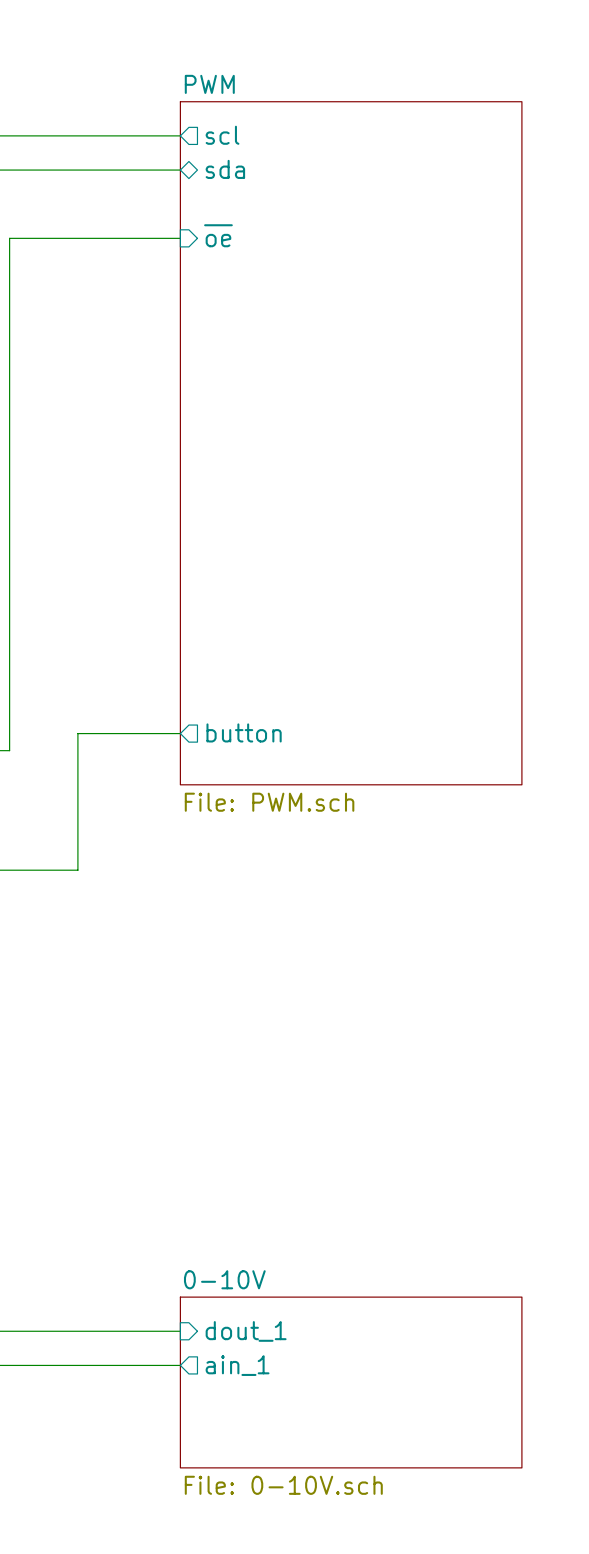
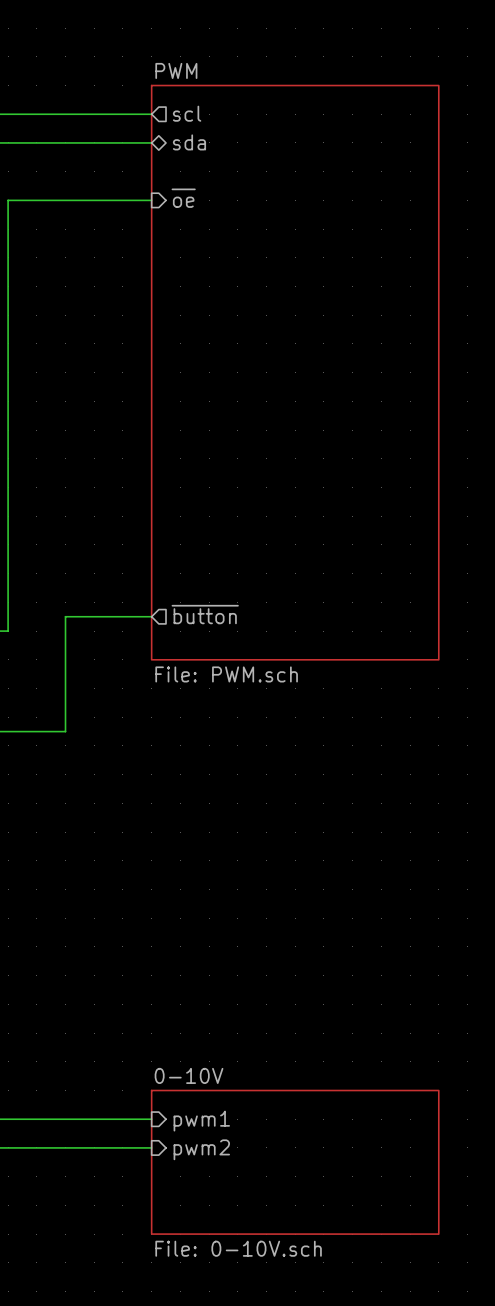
sheet pin: button (244, 732) -> ~{button} (205, 614)
sheet pin: dout_1 (246, 1331) -> pwm1 (201, 1121)
sheet pin shape: output (237, 1365) -> input (201, 1149)
sheet pin: ain_1 (237, 1365) -> pwm2 (201, 1149)

